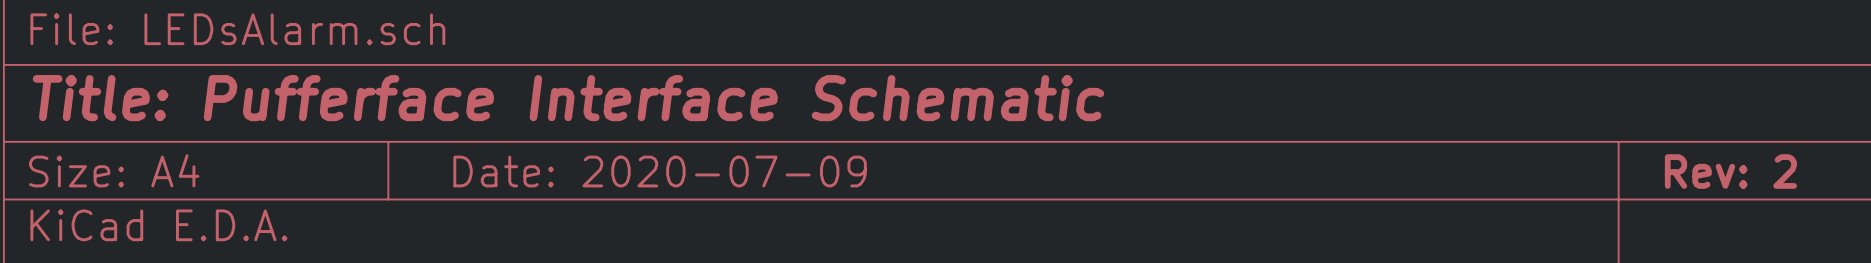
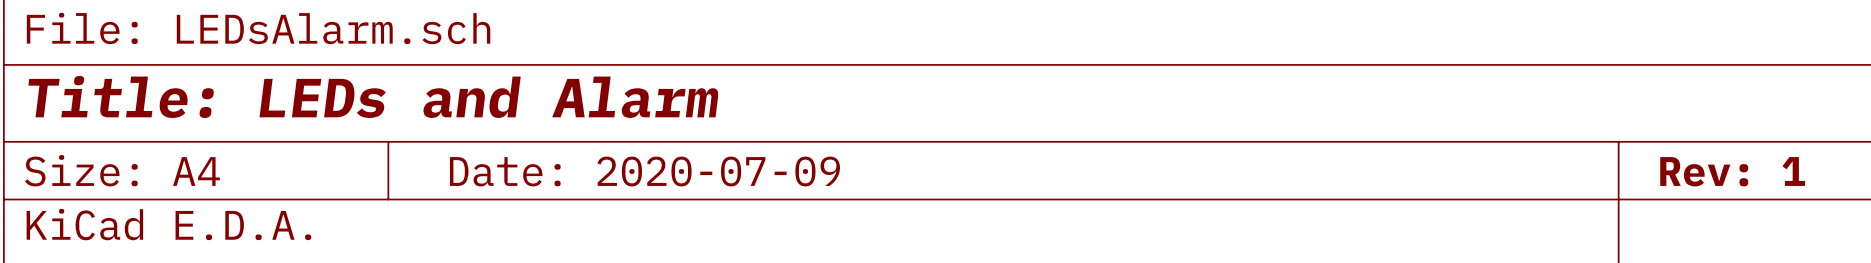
title block: Title: Pufferface Interface Schematic (568, 98) -> Title: LEDs and Alarm (373, 96)
title block: Rev: 2 (1730, 171) -> Rev: 1 (1732, 171)

